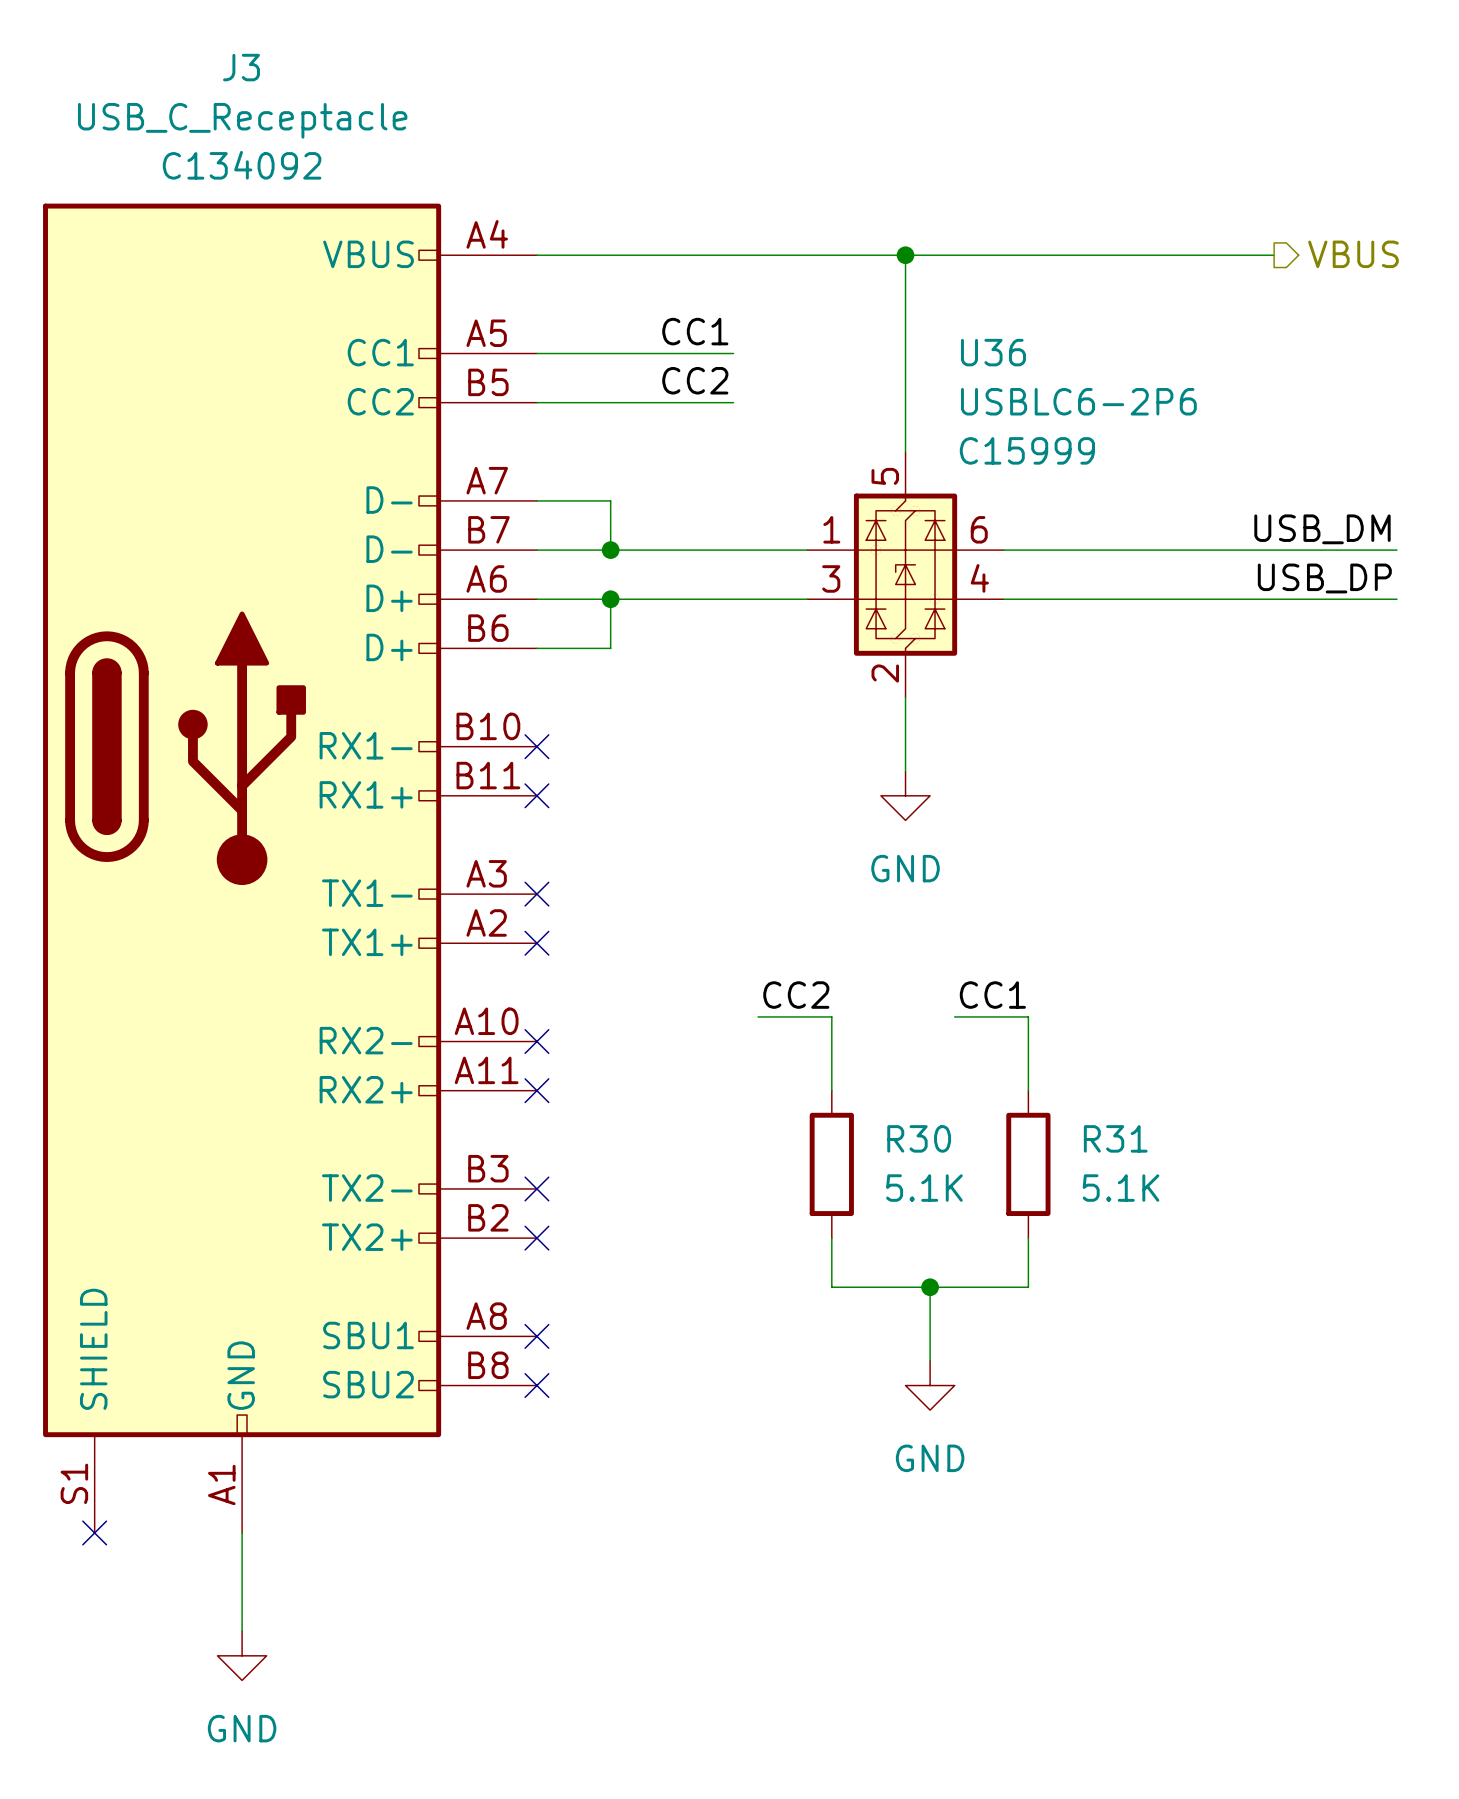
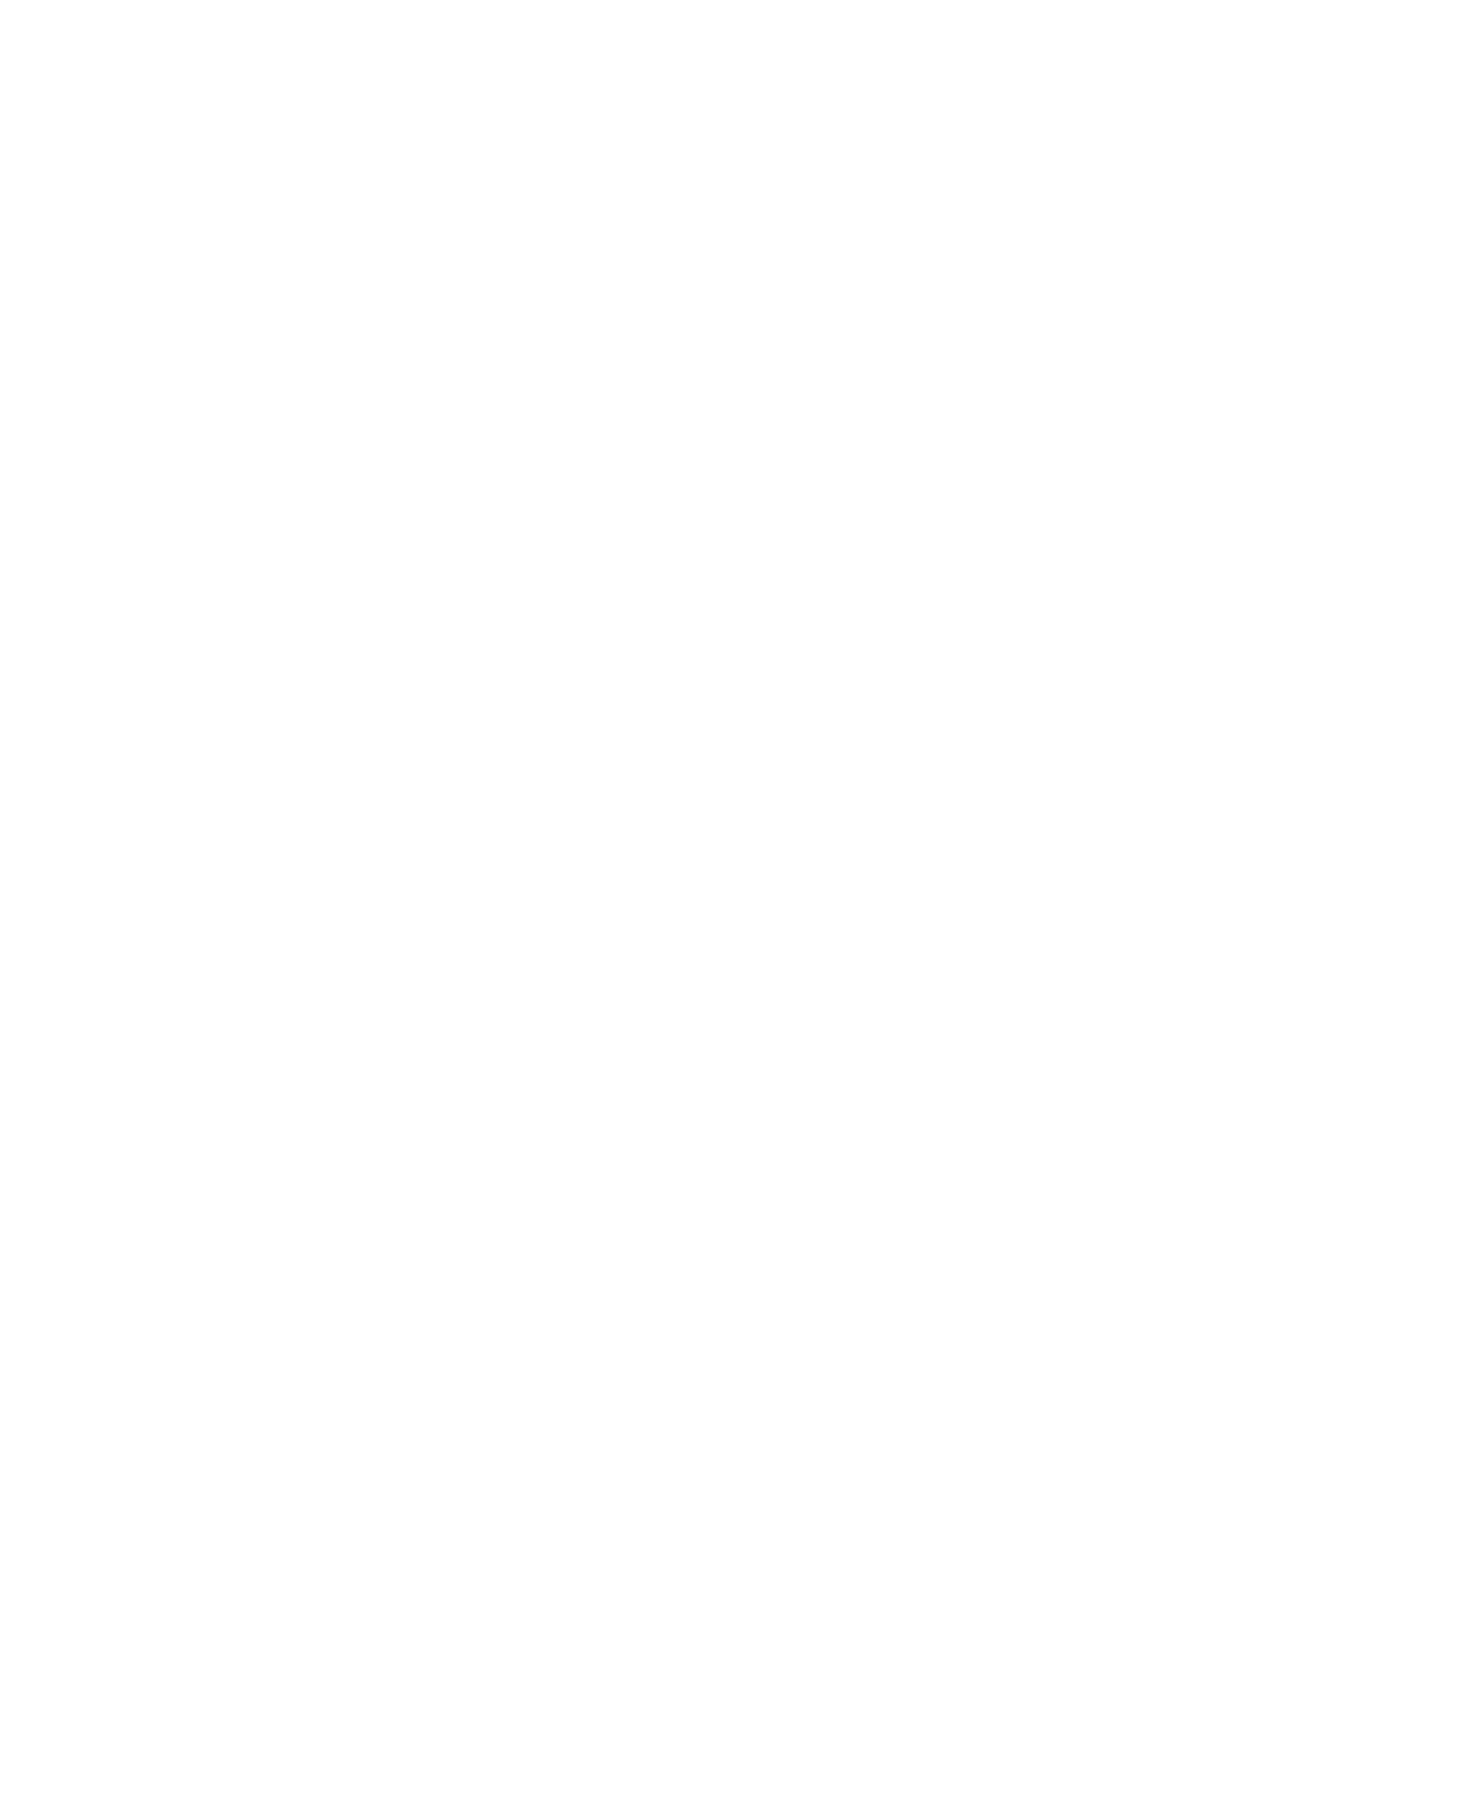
hierarchical label: VBUS (1353, 254) -> none
wire: (536, 255) (1274, 255) -> none
wire: (905, 255) (905, 451) -> none
junction: (905, 255) -> none
label: CC1 (695, 331) -> none
wire: (536, 353) (733, 353) -> none
label: CC2 (695, 380) -> none
wire: (536, 402) (733, 402) -> none
wire: (536, 500) (610, 500) (610, 550) -> none
label: USB_DM (1322, 529) -> none
wire: (536, 550) (807, 550) -> none
junction: (610, 550) -> none
wire: (1003, 550) (1396, 550) -> none
U36: USBLC6-2P6 (905, 574) -> none
label: USB_DP (1324, 578) -> none
wire: (536, 599) (807, 599) -> none
wire: (610, 599) (610, 648) (536, 648) -> none
junction: (610, 599) -> none
wire: (1003, 599) (1396, 599) -> none
wire: (905, 697) (905, 771) -> none
no-connect mark: (536, 746) -> none
no-connect mark: (536, 795) -> none
power symbol: GND (905, 795) -> none
J3: USB_C_Receptacle (290, 868) -> none
no-connect mark: (536, 894) -> none
no-connect mark: (536, 943) -> none
label: CC2 (796, 995) -> none
label: CC1 (992, 995) -> none
wire: (758, 1016) (831, 1016) (831, 1090) -> none
wire: (954, 1016) (1028, 1016) (1028, 1090) -> none
no-connect mark: (536, 1041) -> none
no-connect mark: (536, 1090) -> none
R30: 5.1K (831, 1164) -> none
R31: 5.1K (1028, 1164) -> none
no-connect mark: (536, 1188) -> none
no-connect mark: (536, 1238) -> none
wire: (831, 1238) (831, 1287) (1028, 1287) (1028, 1238) -> none
wire: (930, 1287) (930, 1360) -> none
junction: (930, 1287) -> none
no-connect mark: (536, 1336) -> none
no-connect mark: (536, 1385) -> none
power symbol: GND (930, 1385) -> none
no-connect mark: (94, 1532) -> none
wire: (242, 1532) (242, 1631) -> none
power symbol: GND (242, 1655) -> none

